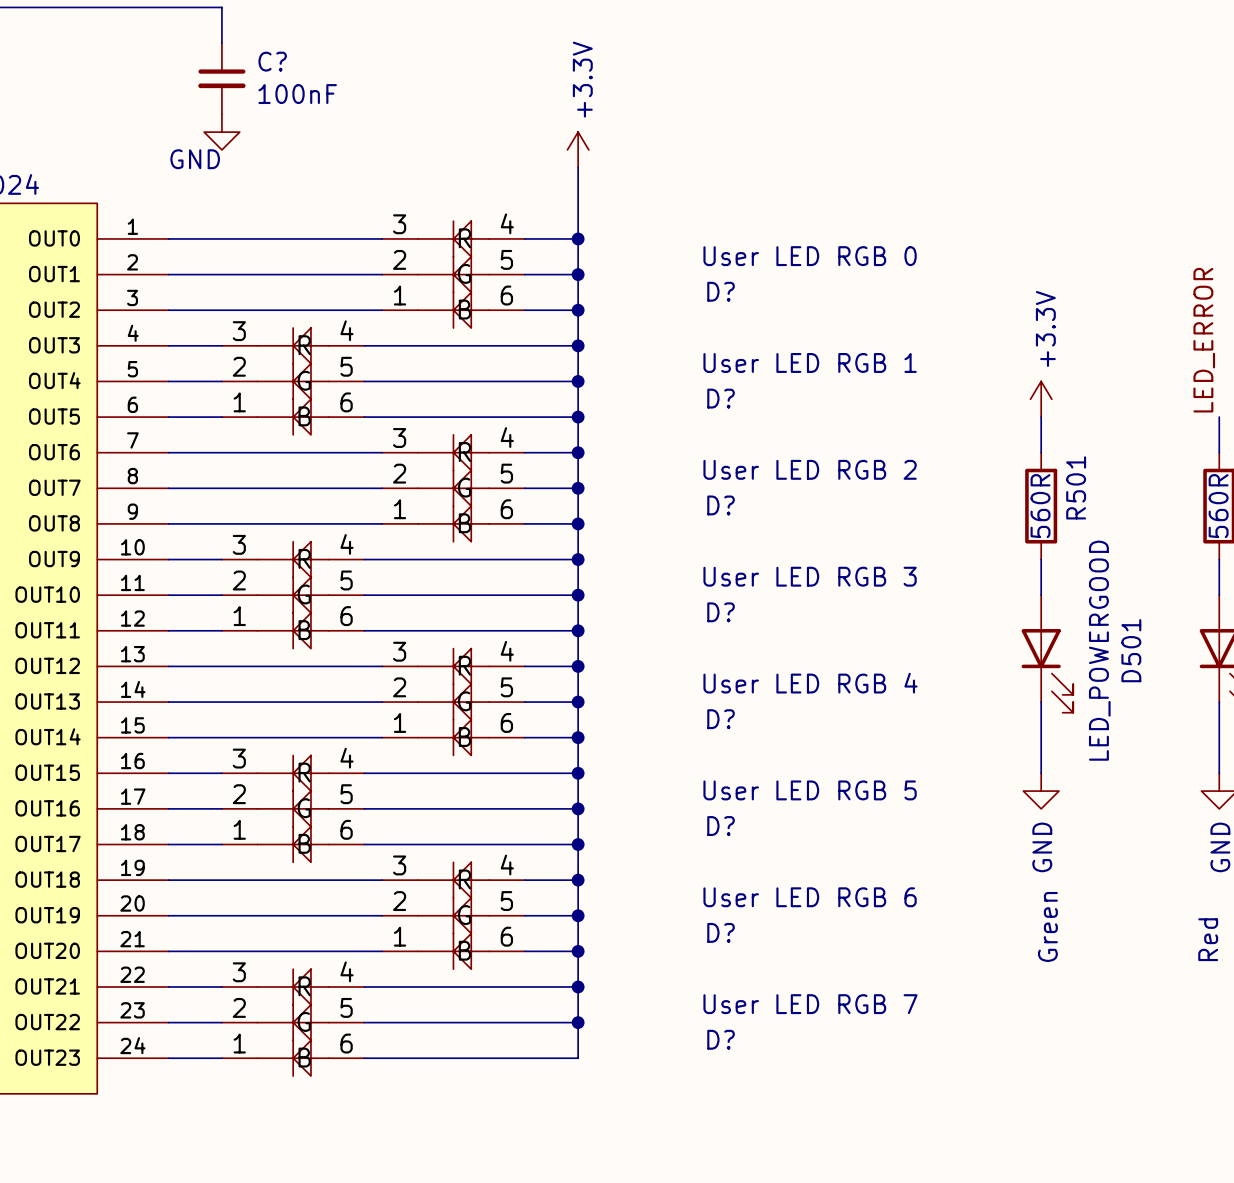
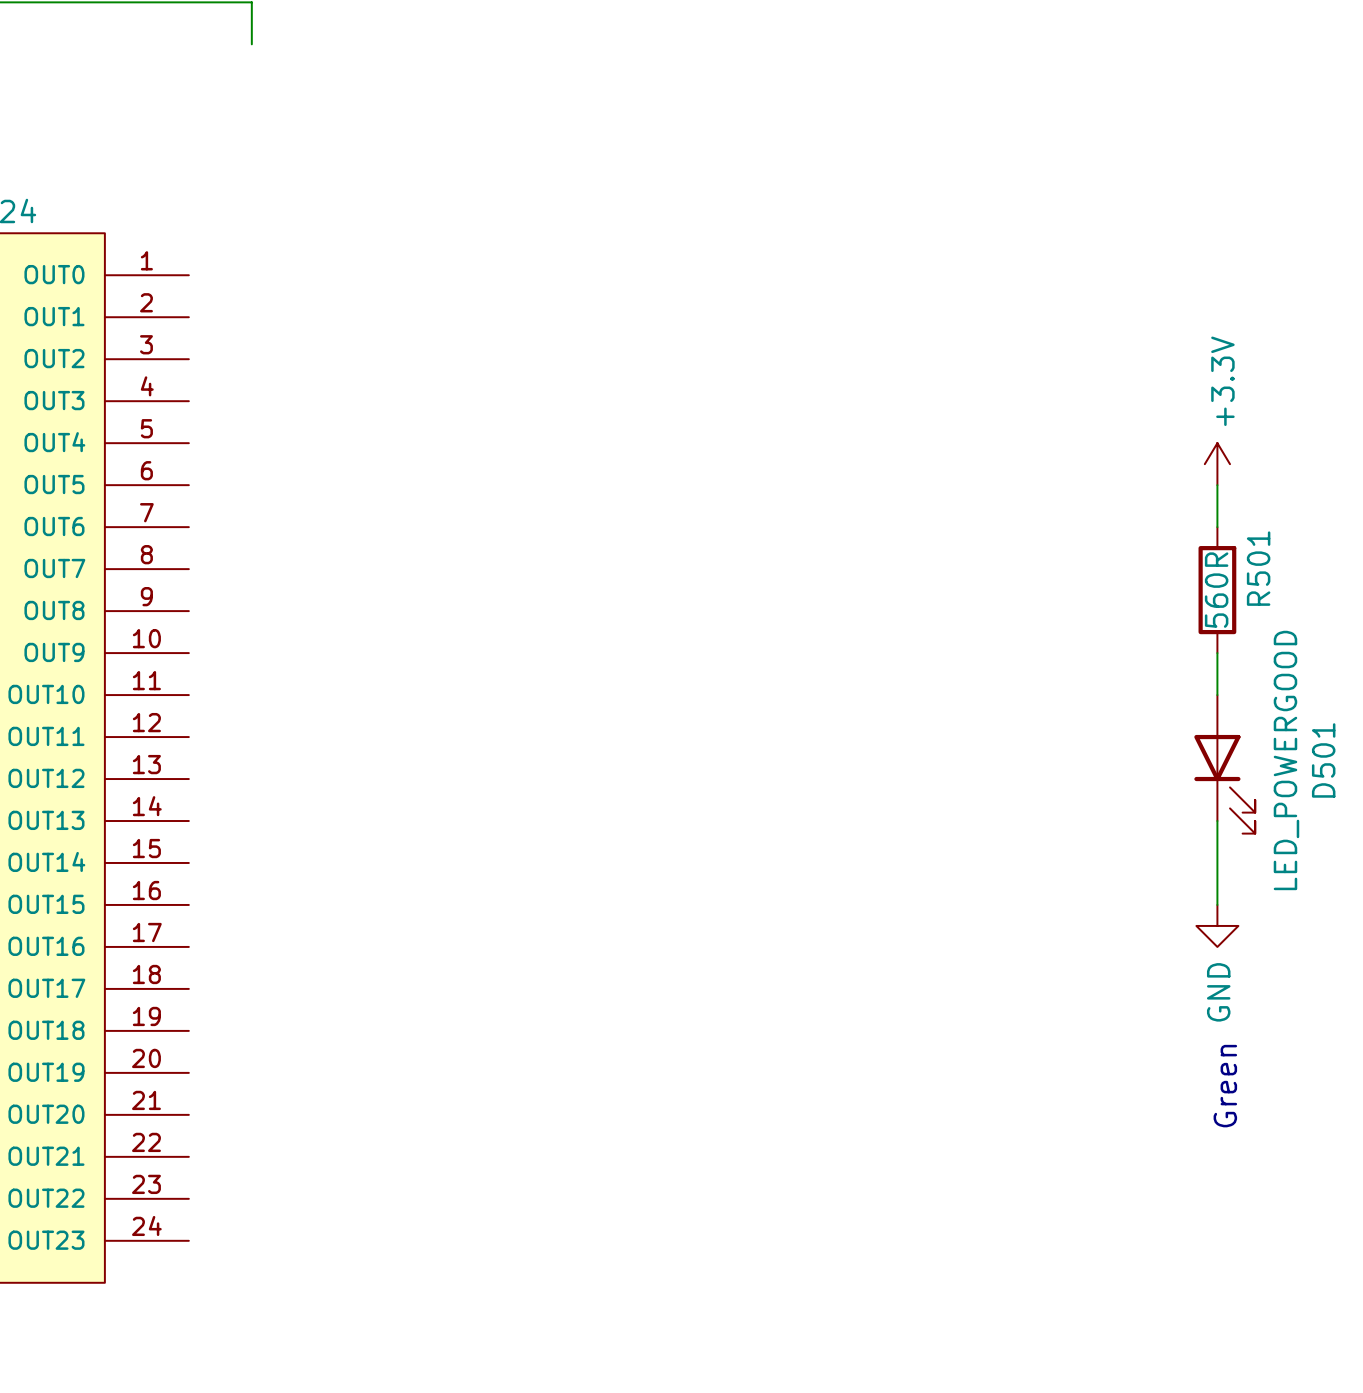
C?: 100nF (221, 78) -> none
power symbol: GND (221, 132) -> none
power symbol: +3.3V (578, 149) -> none
wire: (578, 167) (578, 1058) (364, 1058) -> none
wire: (168, 238) (382, 238) -> none
wire: (524, 238) (578, 238) -> none
junction: (578, 238) -> none
wire: (168, 274) (382, 274) -> none
D?: User LED RGB 0 (453, 274) -> none
wire: (524, 274) (578, 274) -> none
junction: (578, 274) -> none
wire: (168, 310) (382, 310) -> none
wire: (524, 310) (578, 310) -> none
junction: (578, 310) -> none
wire: (168, 345) (221, 345) -> none
wire: (364, 345) (578, 345) -> none
junction: (578, 345) -> none
wire: (168, 381) (221, 381) -> none
D?: User LED RGB 1 (293, 381) -> none
wire: (364, 381) (578, 381) -> none
junction: (578, 381) -> none
wire: (168, 417) (221, 417) -> none
wire: (364, 417) (578, 417) -> none
junction: (578, 417) -> none
wire: (168, 452) (382, 452) -> none
wire: (524, 452) (578, 452) -> none
junction: (578, 452) -> none
wire: (168, 488) (382, 488) -> none
D?: User LED RGB 2 (453, 488) -> none
wire: (524, 488) (578, 488) -> none
junction: (578, 488) -> none
wire: (168, 523) (382, 523) -> none
wire: (524, 523) (578, 523) -> none
junction: (578, 523) -> none
wire: (168, 559) (221, 559) -> none
wire: (364, 559) (578, 559) -> none
junction: (578, 559) -> none
wire: (168, 595) (221, 595) -> none
D?: User LED RGB 3 (293, 595) -> none
wire: (364, 595) (578, 595) -> none
junction: (578, 595) -> none
wire: (168, 630) (221, 630) -> none
wire: (364, 630) (578, 630) -> none
junction: (578, 630) -> none
wire: (168, 666) (382, 666) -> none
wire: (524, 666) (578, 666) -> none
junction: (578, 666) -> none
wire: (168, 702) (382, 702) -> none
D?: User LED RGB 4 (453, 702) -> none
wire: (524, 702) (578, 702) -> none
junction: (578, 702) -> none
wire: (168, 737) (382, 737) -> none
wire: (524, 737) (578, 737) -> none
junction: (578, 737) -> none
wire: (168, 773) (221, 773) -> none
wire: (364, 773) (578, 773) -> none
junction: (578, 773) -> none
wire: (168, 808) (221, 808) -> none
D?: User LED RGB 5 (293, 808) -> none
wire: (364, 808) (578, 808) -> none
junction: (578, 808) -> none
wire: (168, 844) (221, 844) -> none
wire: (364, 844) (578, 844) -> none
junction: (578, 844) -> none
wire: (168, 880) (382, 880) -> none
wire: (524, 880) (578, 880) -> none
junction: (578, 880) -> none
wire: (168, 915) (382, 915) -> none
D?: User LED RGB 6 (453, 915) -> none
wire: (524, 915) (578, 915) -> none
junction: (578, 915) -> none
wire: (168, 951) (382, 951) -> none
wire: (524, 951) (578, 951) -> none
junction: (578, 951) -> none
wire: (168, 986) (221, 986) -> none
wire: (364, 986) (578, 986) -> none
junction: (578, 986) -> none
wire: (168, 1022) (221, 1022) -> none
D?: User LED RGB 7 (293, 1022) -> none
wire: (364, 1022) (578, 1022) -> none
junction: (578, 1022) -> none
wire: (168, 1058) (221, 1058) -> none

